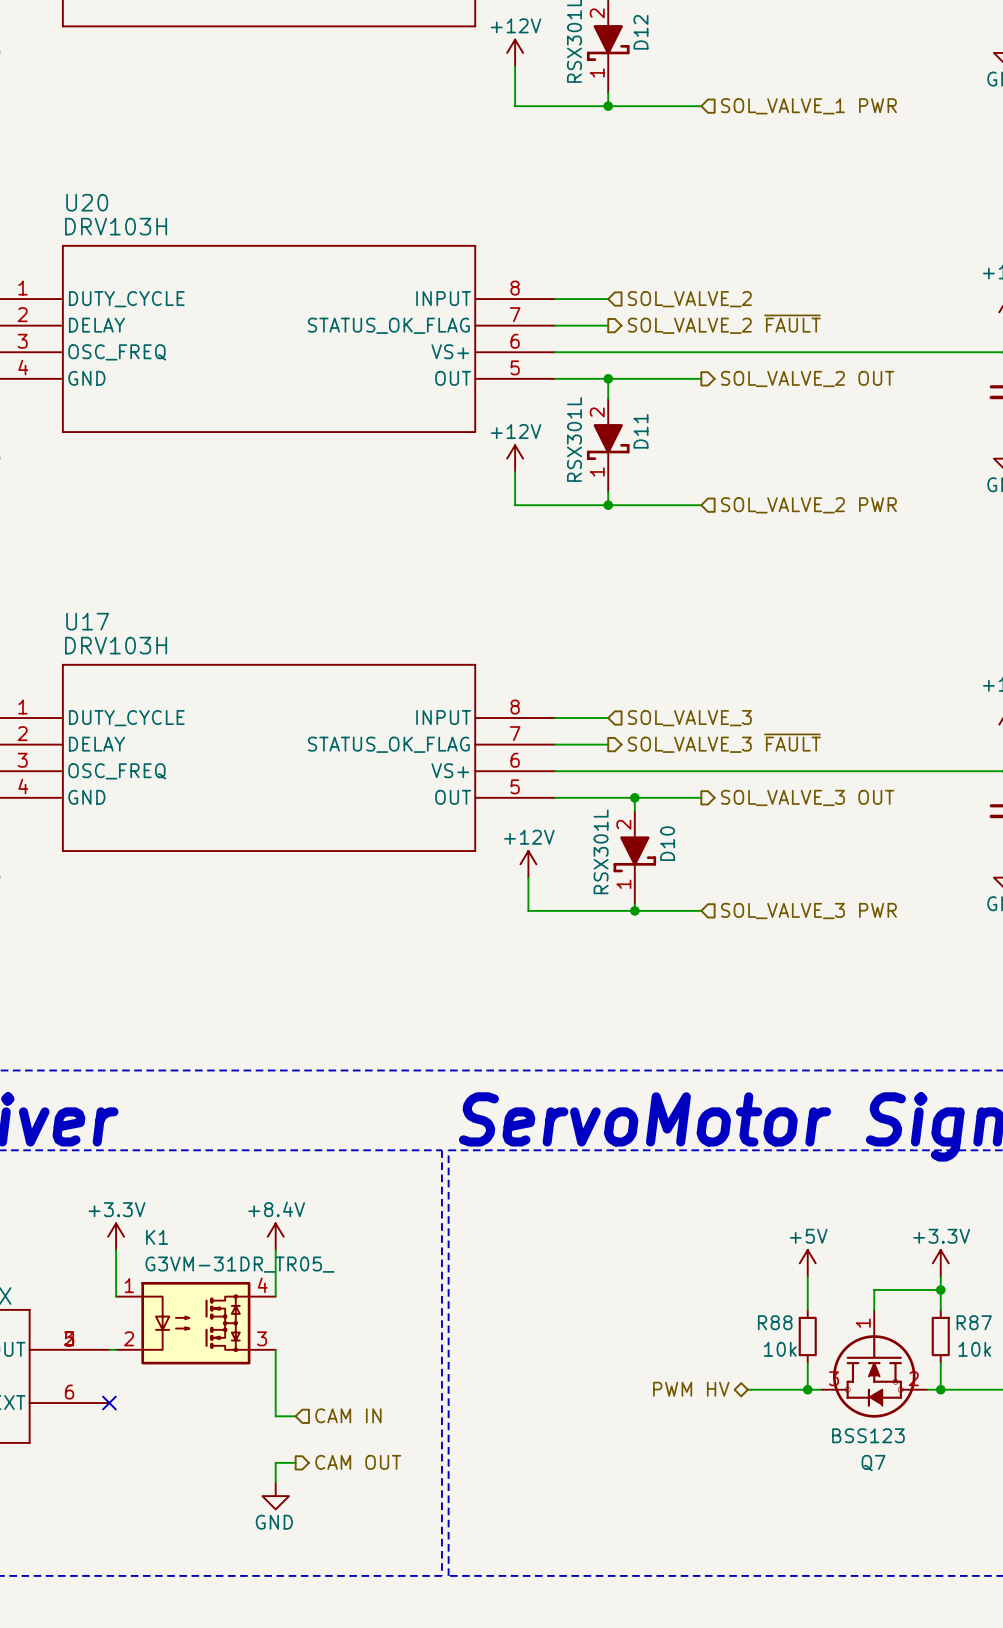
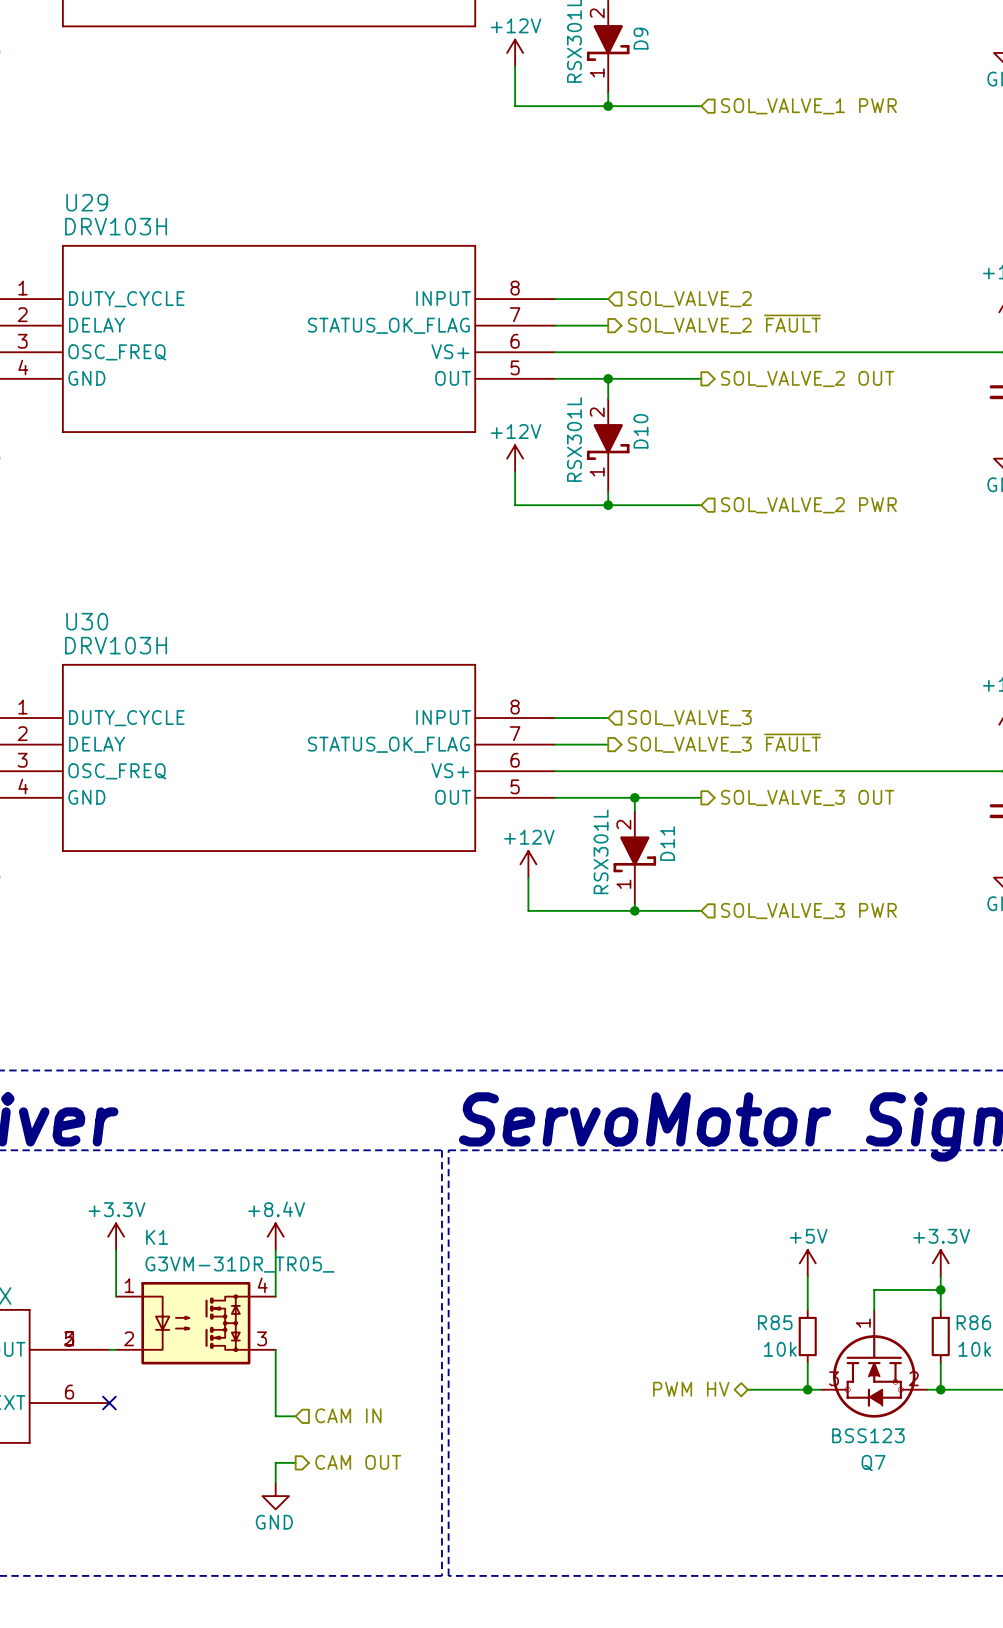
D12 name: D12 (640, 32) -> D9 (640, 38)
U20 name: U20 (87, 202) -> U29 (87, 202)
D11 name: D11 (640, 431) -> D10 (640, 431)
U17 name: U17 (87, 621) -> U30 (87, 621)
D10 name: D10 (667, 843) -> D11 (667, 843)
R88 name: R88 (775, 1322) -> R85 (775, 1322)
R87 name: R87 (974, 1322) -> R86 (973, 1322)

